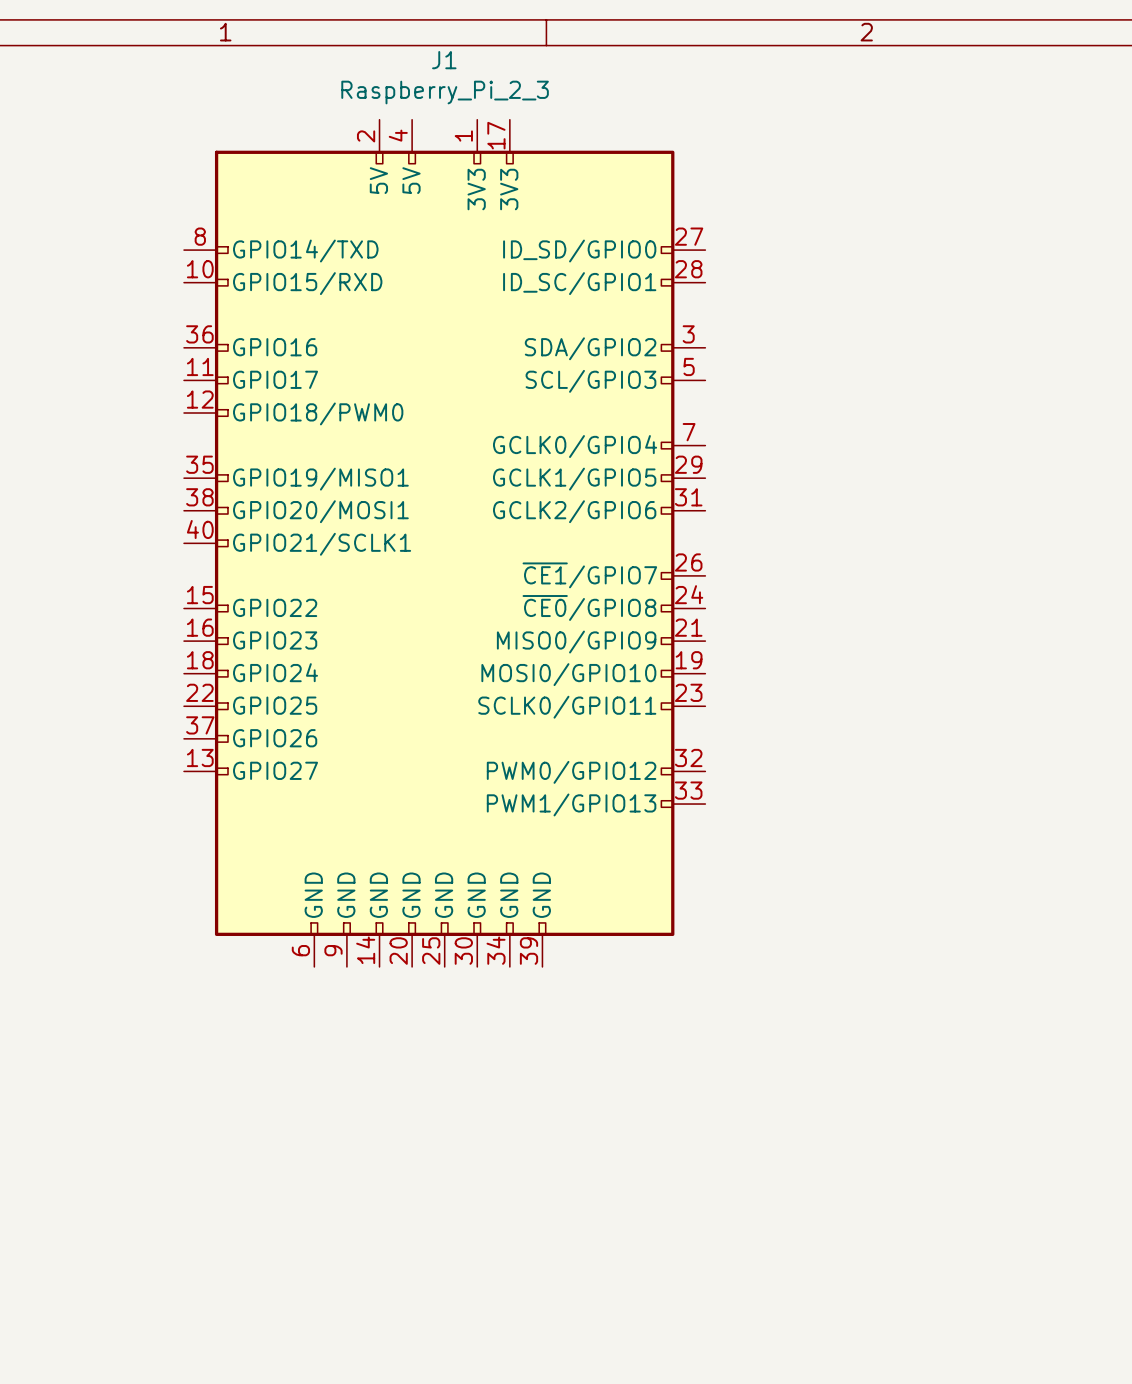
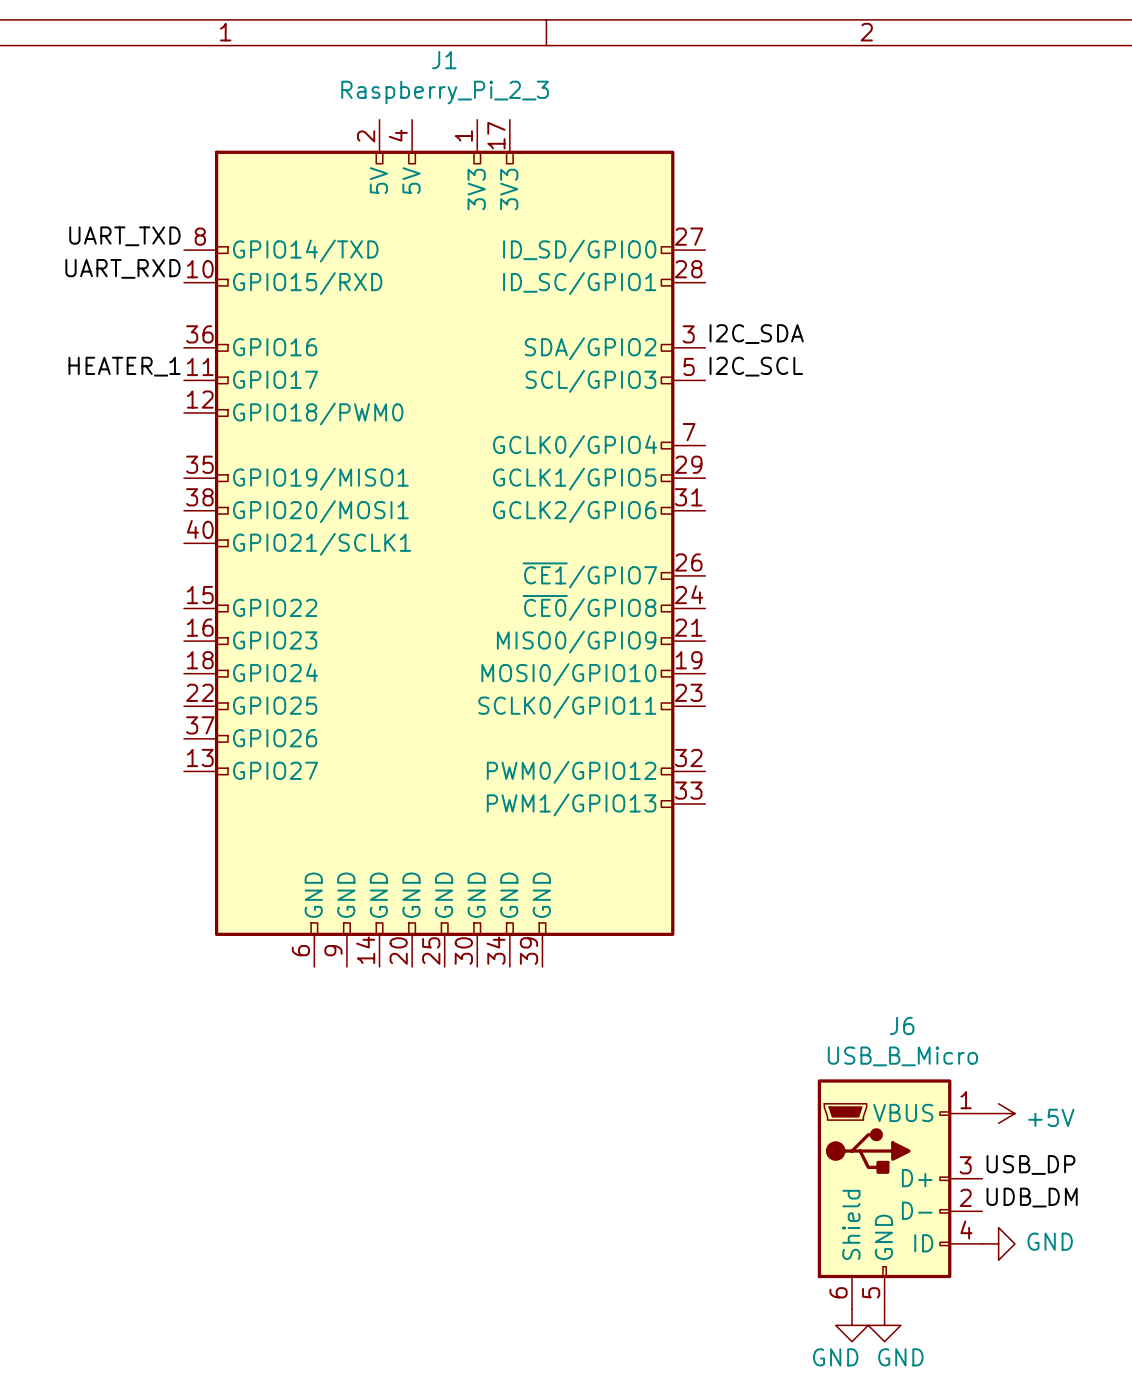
label: none -> UART_TXD (124, 236)
label: none -> UART_RXD (122, 268)
label: none -> I2C_SDA (756, 334)
label: none -> HEATER_1 (124, 366)
label: none -> I2C_SCL (756, 366)
power symbol: none -> +5V (998, 1113)
label: none -> USB_DP (1030, 1164)
J6: none -> USB_B_Micro (900, 1194)
label: none -> UDB_DM (1032, 1197)
power symbol: none -> GND (998, 1243)
power symbol: none -> GND (852, 1325)
power symbol: none -> GND (884, 1325)

